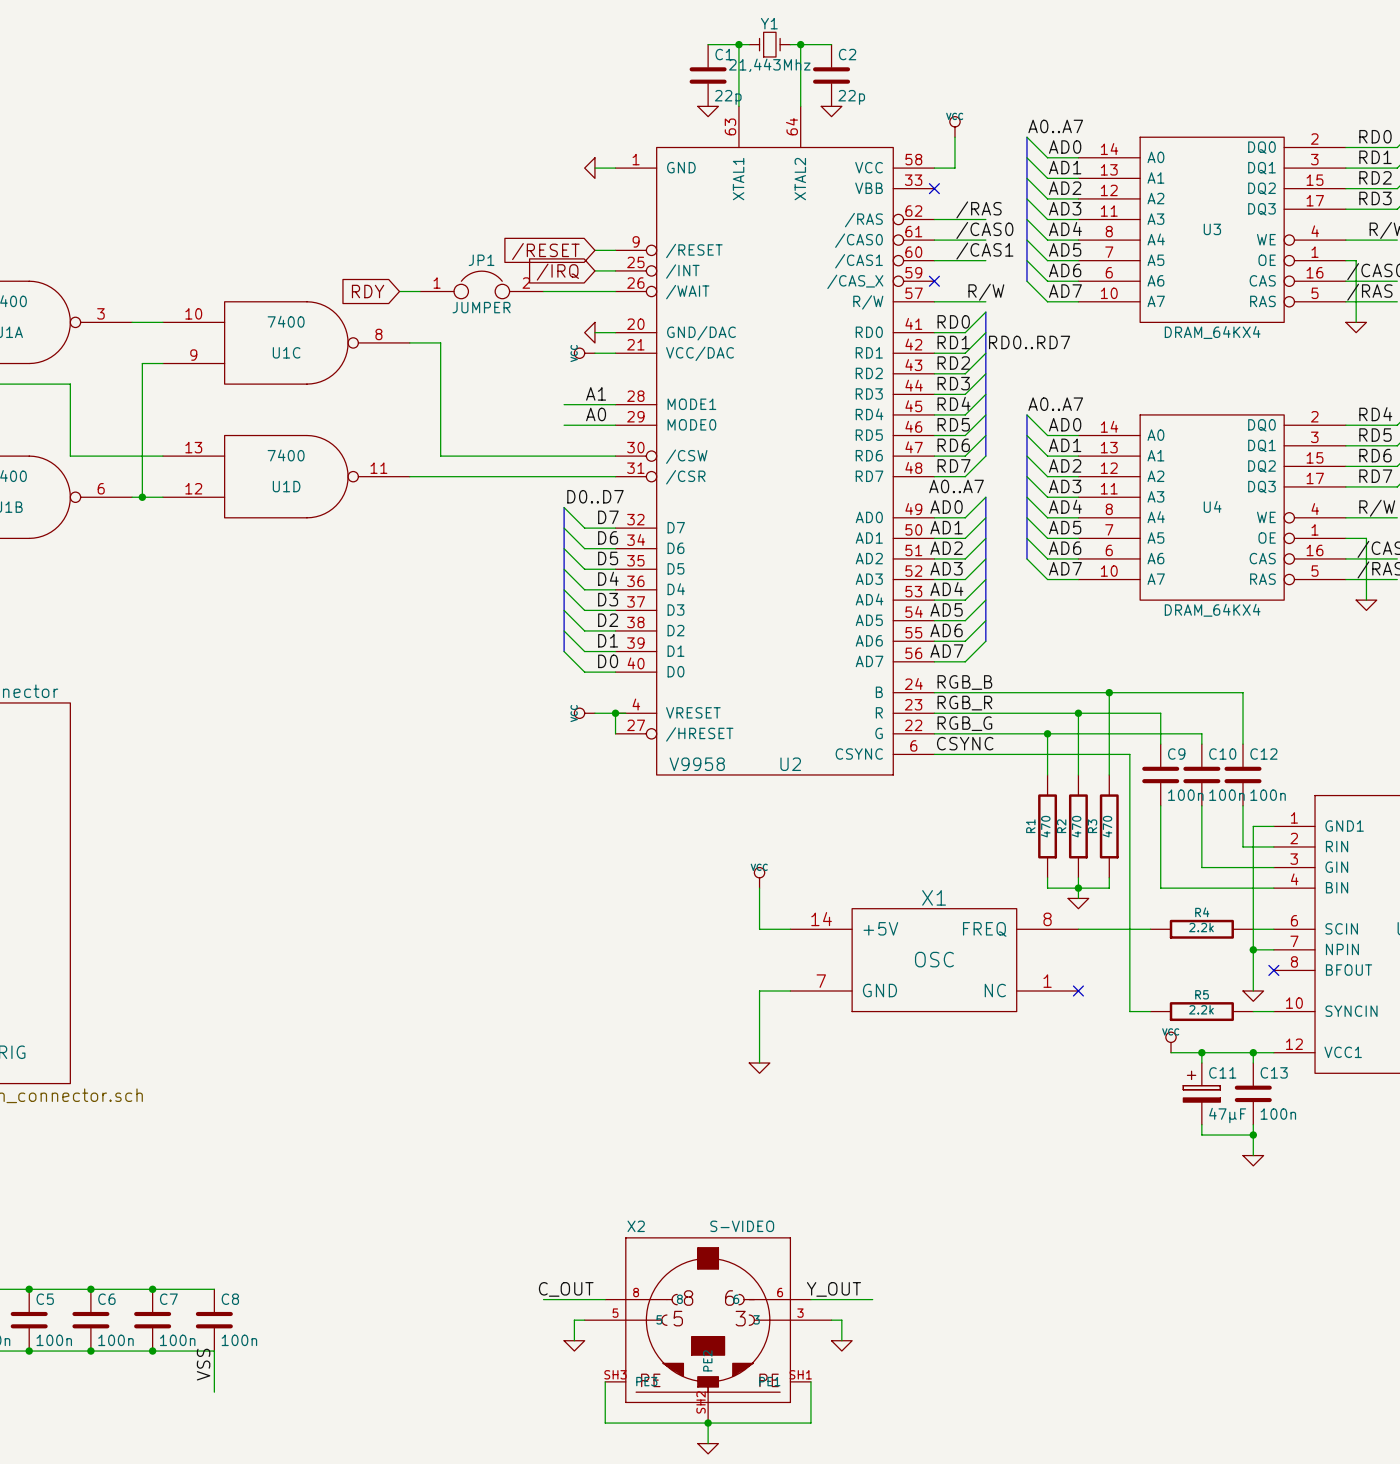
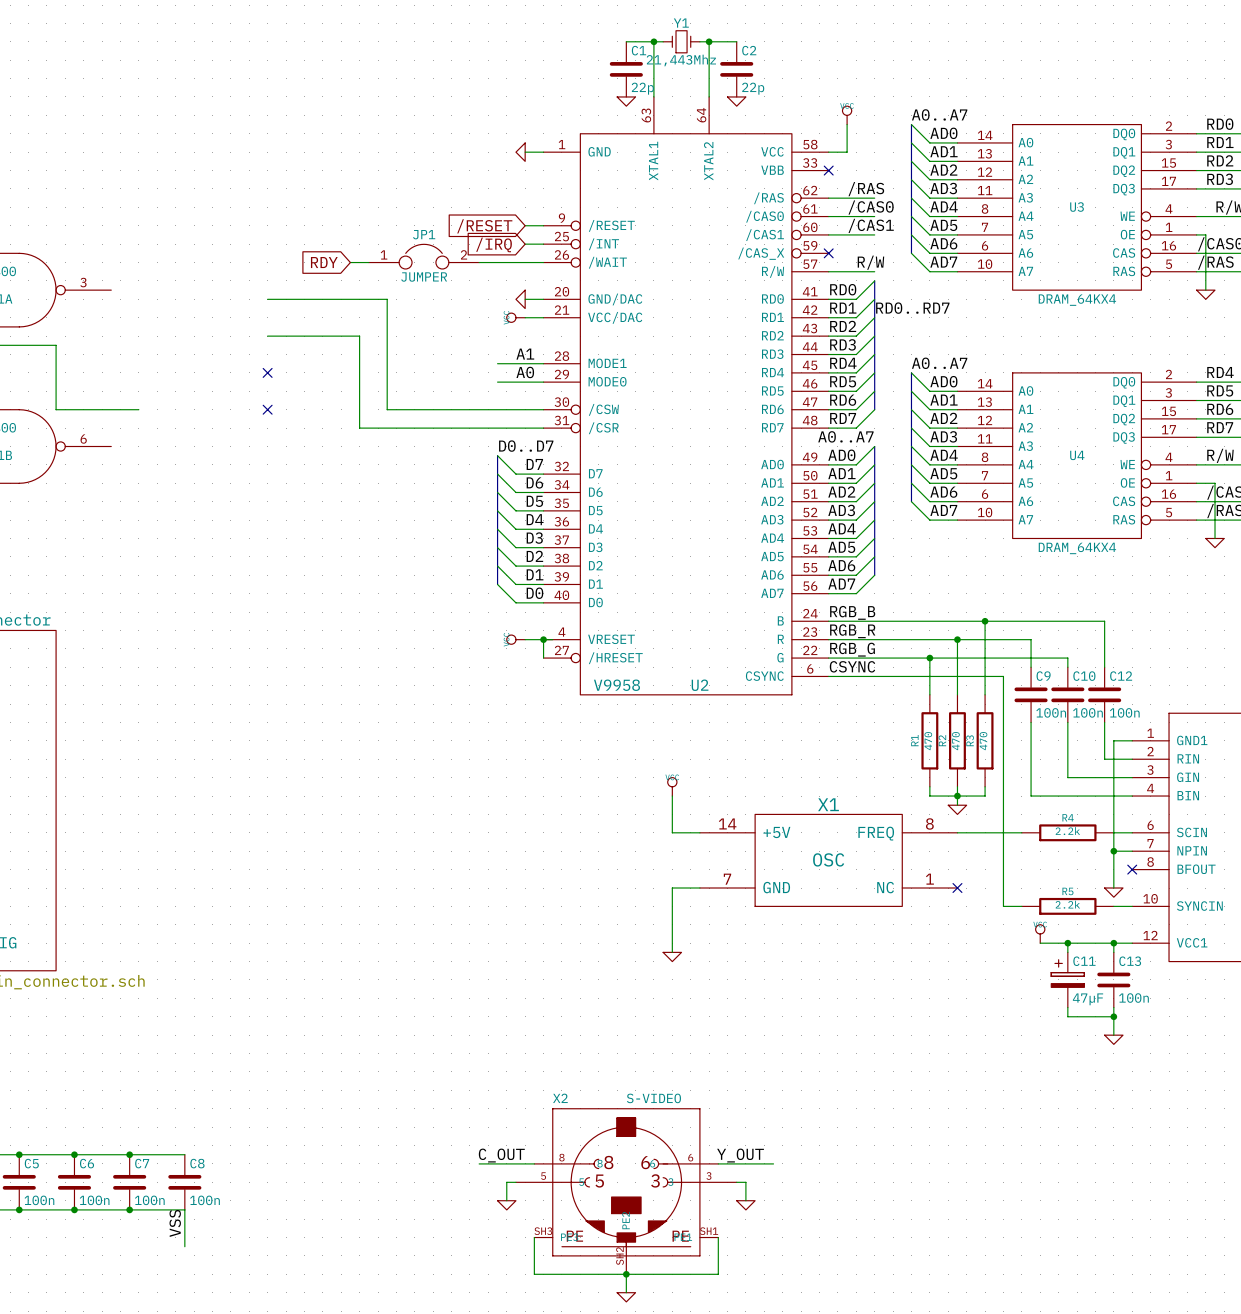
wire: (132, 322) (162, 322) -> none
U1C: 7400 (286, 342) -> none
wire: (409, 342) (440, 342) -> (267, 299) (387, 299) (387, 308)
wire: (162, 363) (142, 363) (142, 497) -> none
wire: none -> (267, 336) (359, 336) (359, 428)
no-connect mark: none -> (267, 372)
no-connect mark: none -> (267, 409)
U1D: 7400 (286, 476) -> none
wire: (132, 497) (162, 497) -> none
junction: (142, 497) -> none

